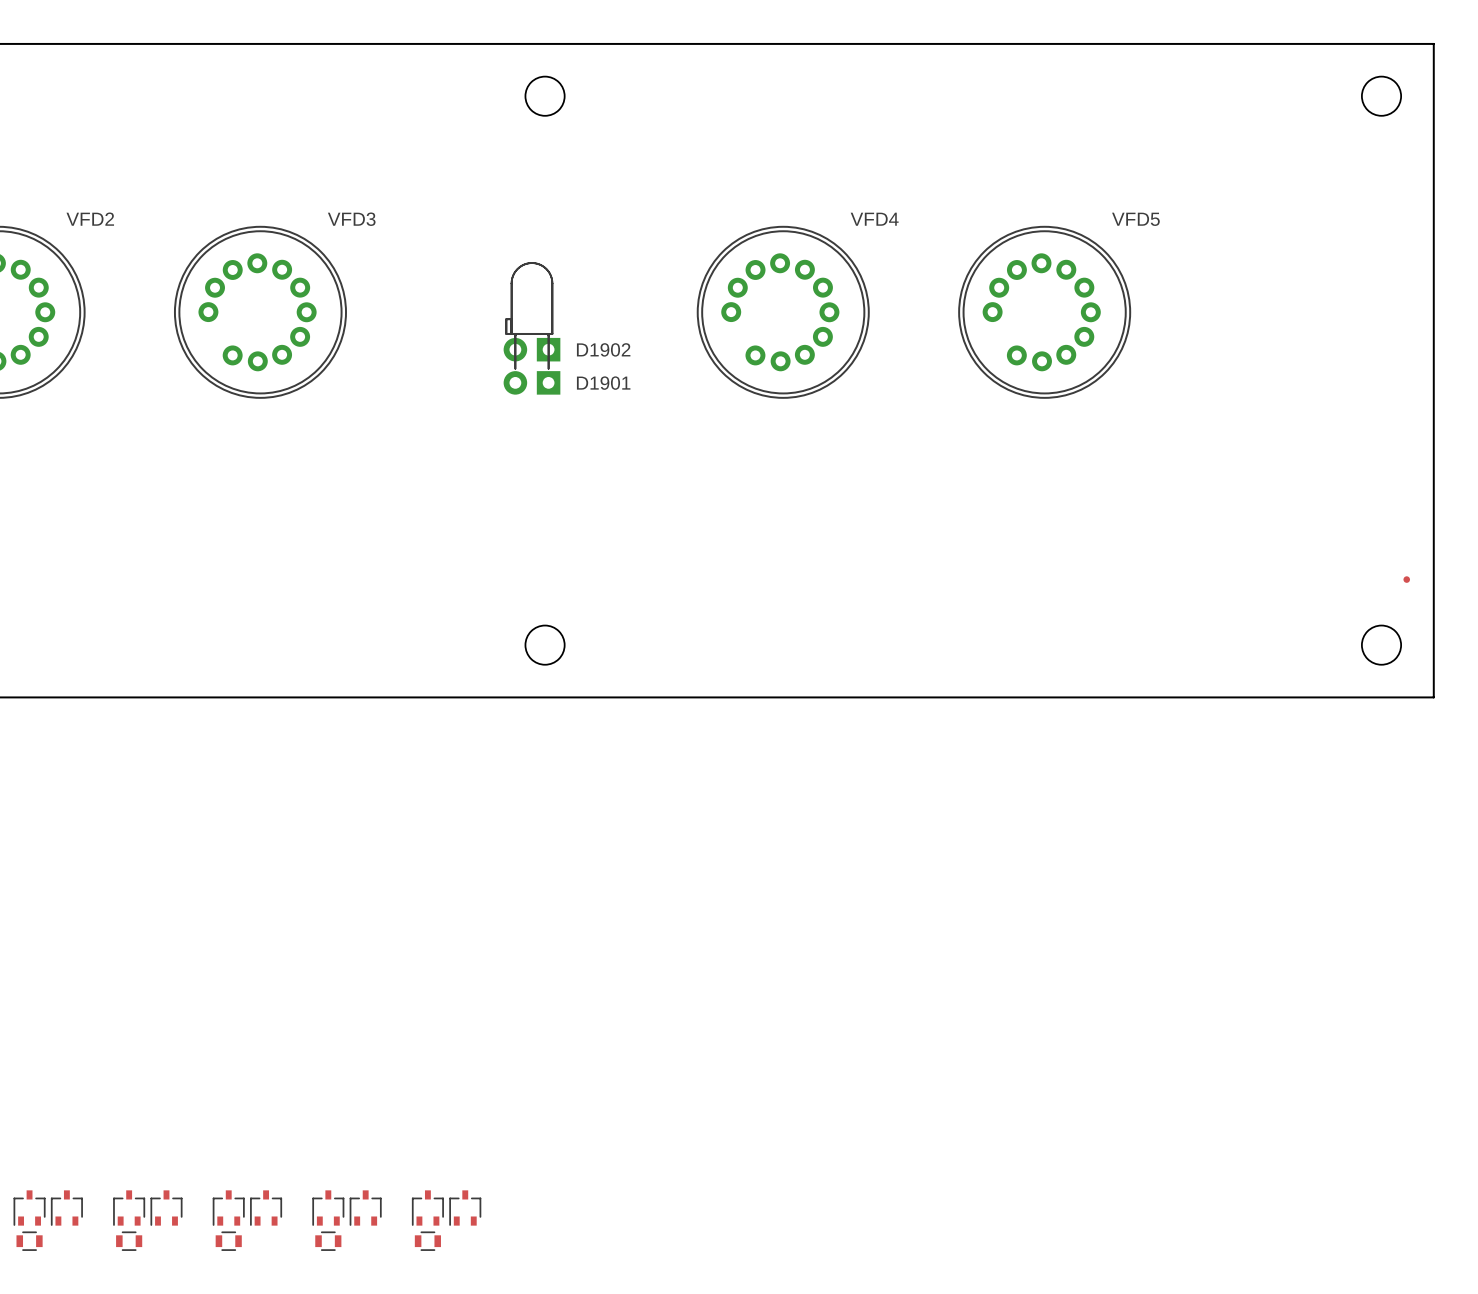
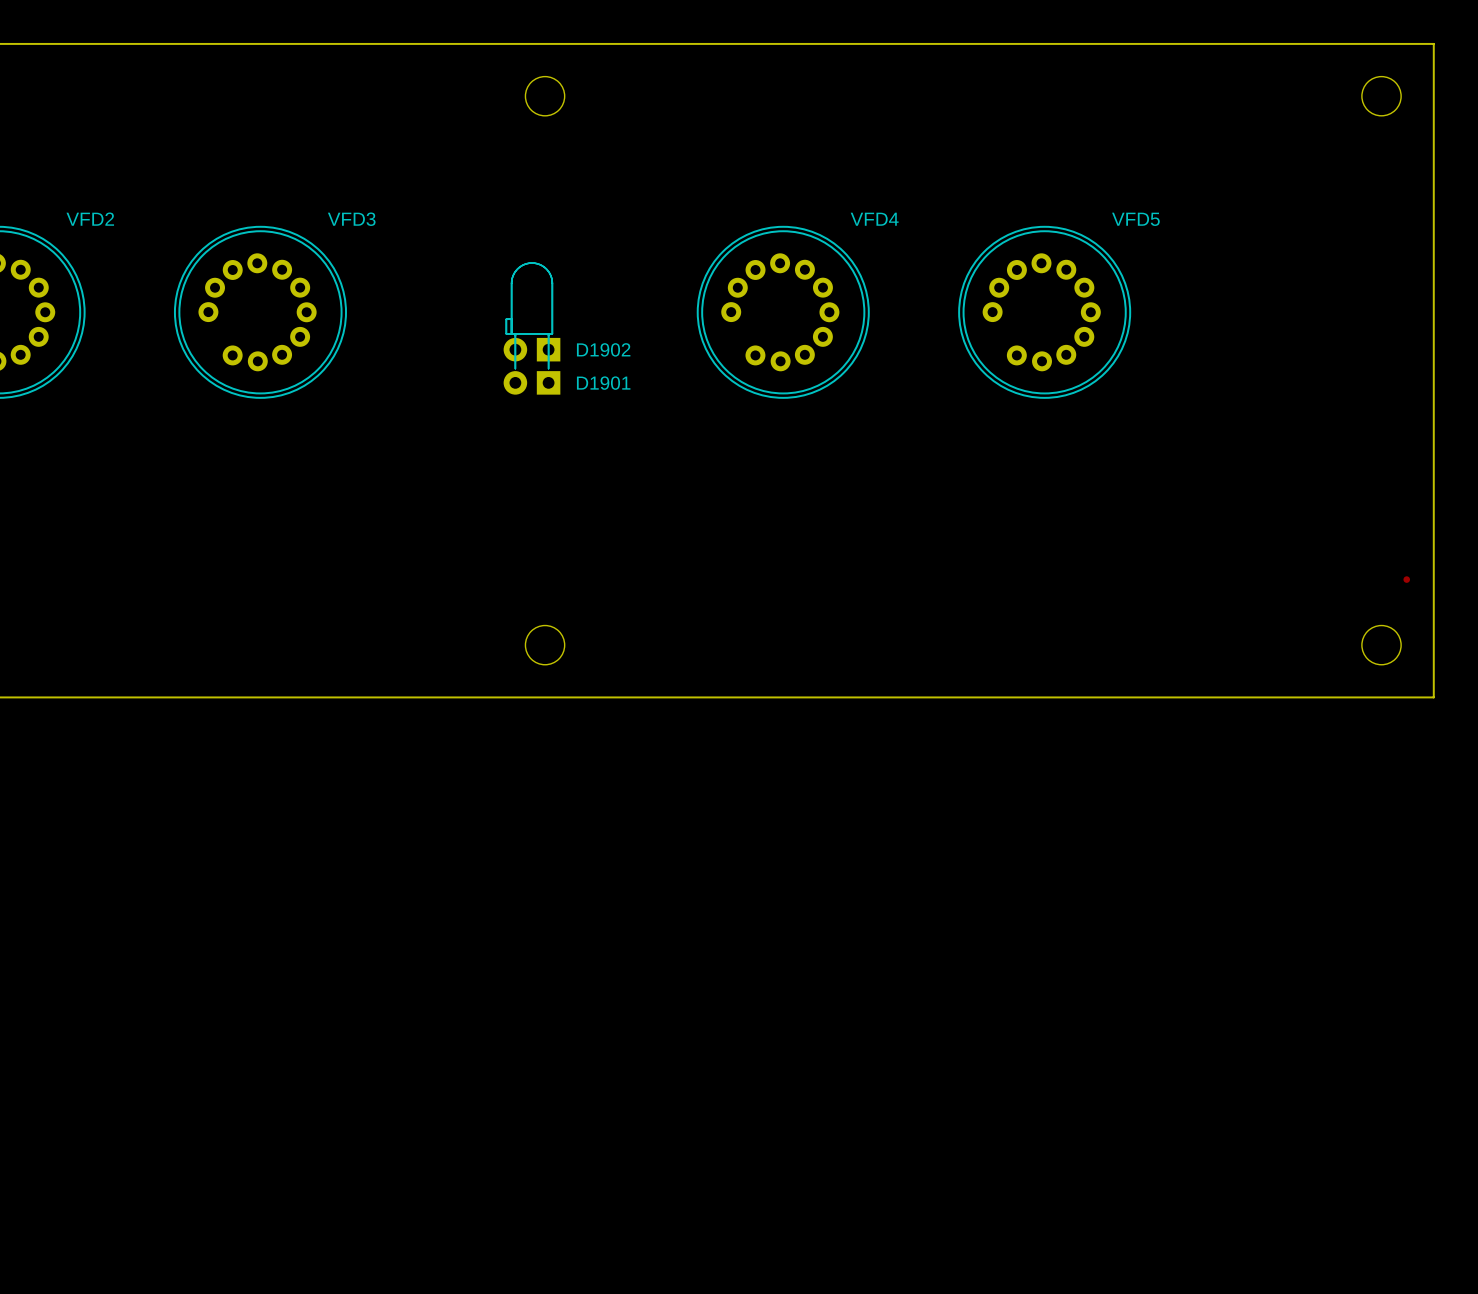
part: (29, 1208) -> none
part: (66, 1208) -> none
part: (129, 1208) -> none
part: (166, 1208) -> none
part: (228, 1208) -> none
part: (266, 1208) -> none
part: (328, 1208) -> none
part: (365, 1208) -> none
part: (427, 1208) -> none
part: (465, 1208) -> none
part: (29, 1241) -> none
part: (129, 1241) -> none
part: (228, 1241) -> none
part: (328, 1241) -> none
part: (427, 1241) -> none

